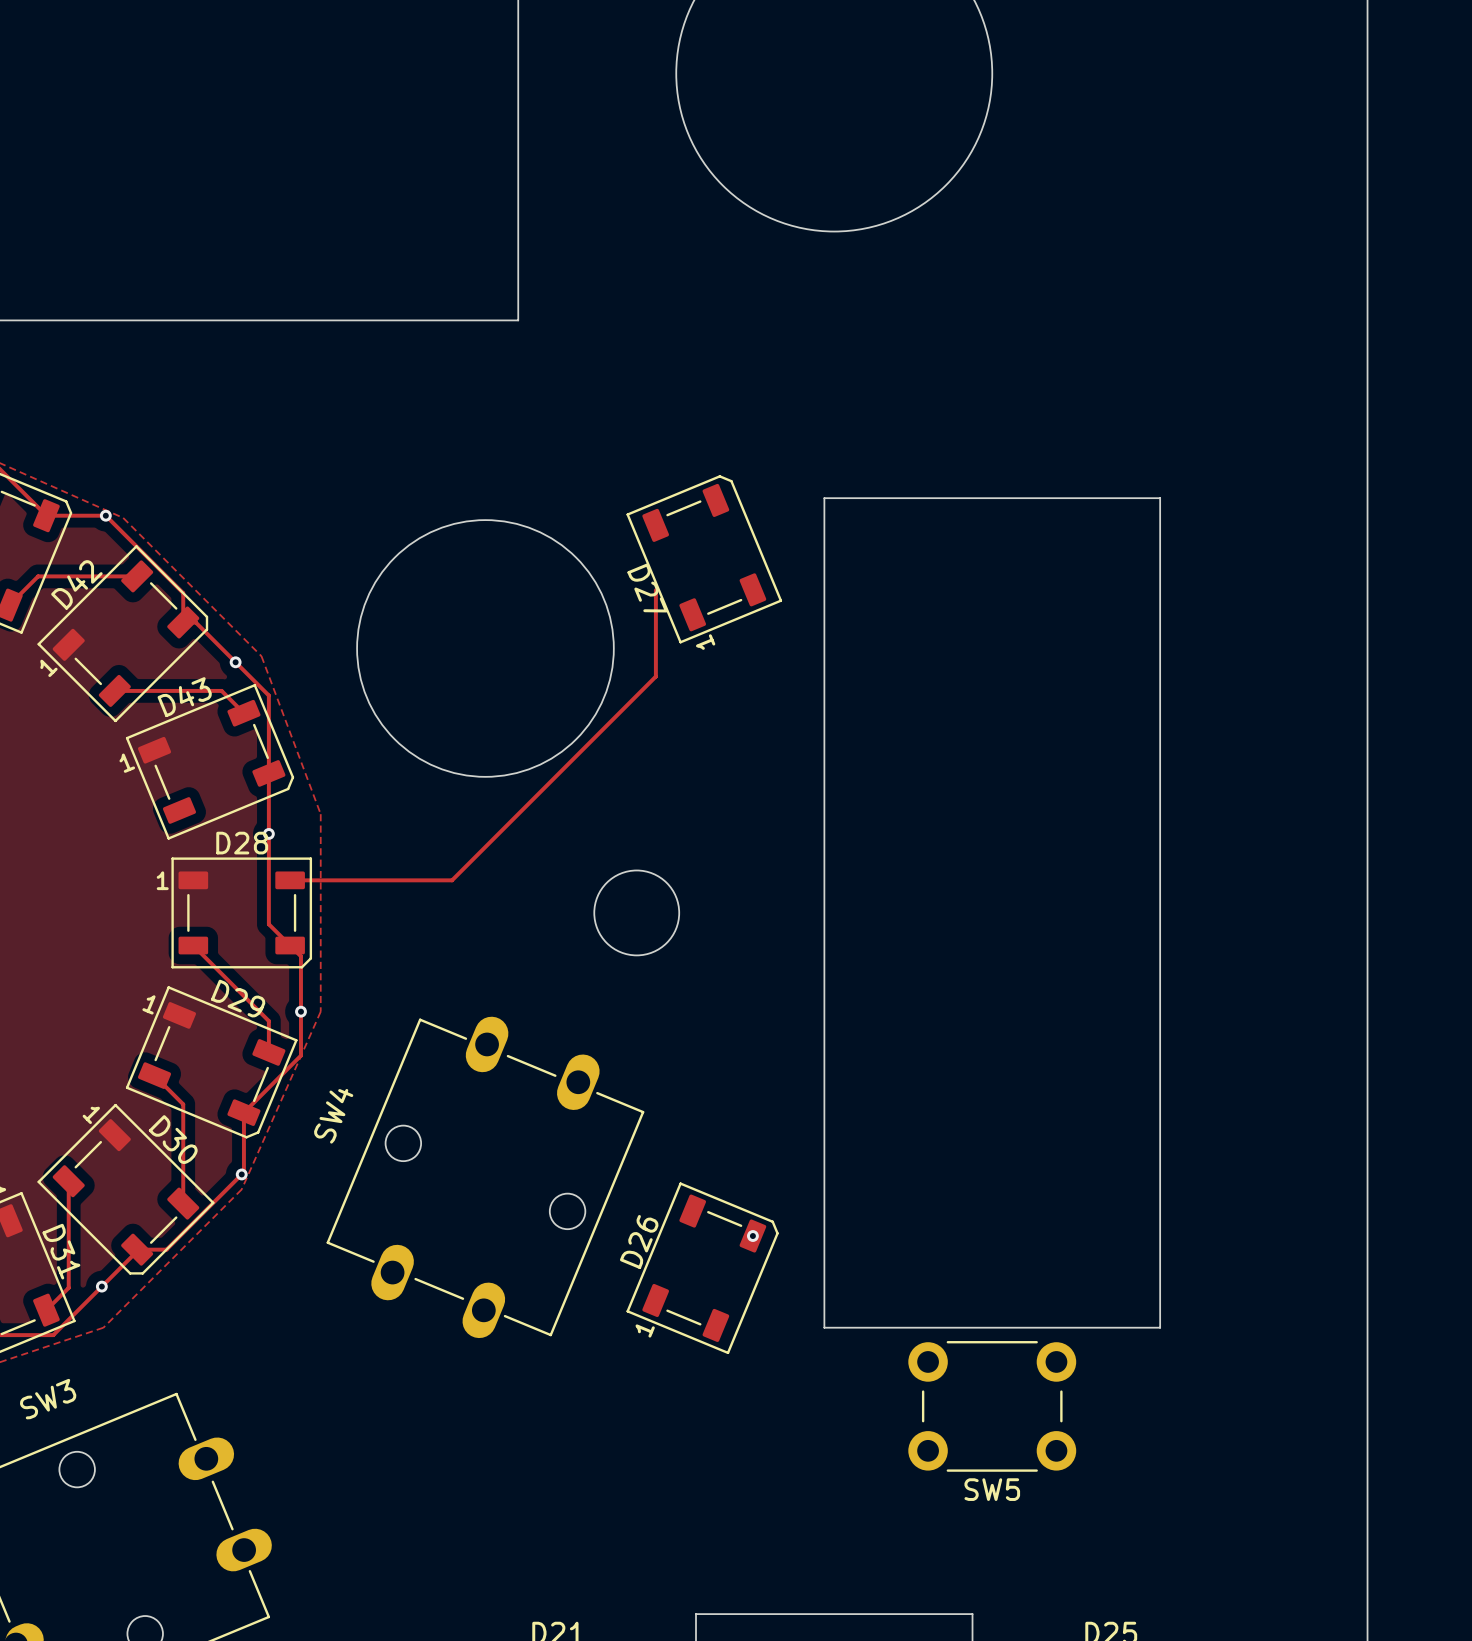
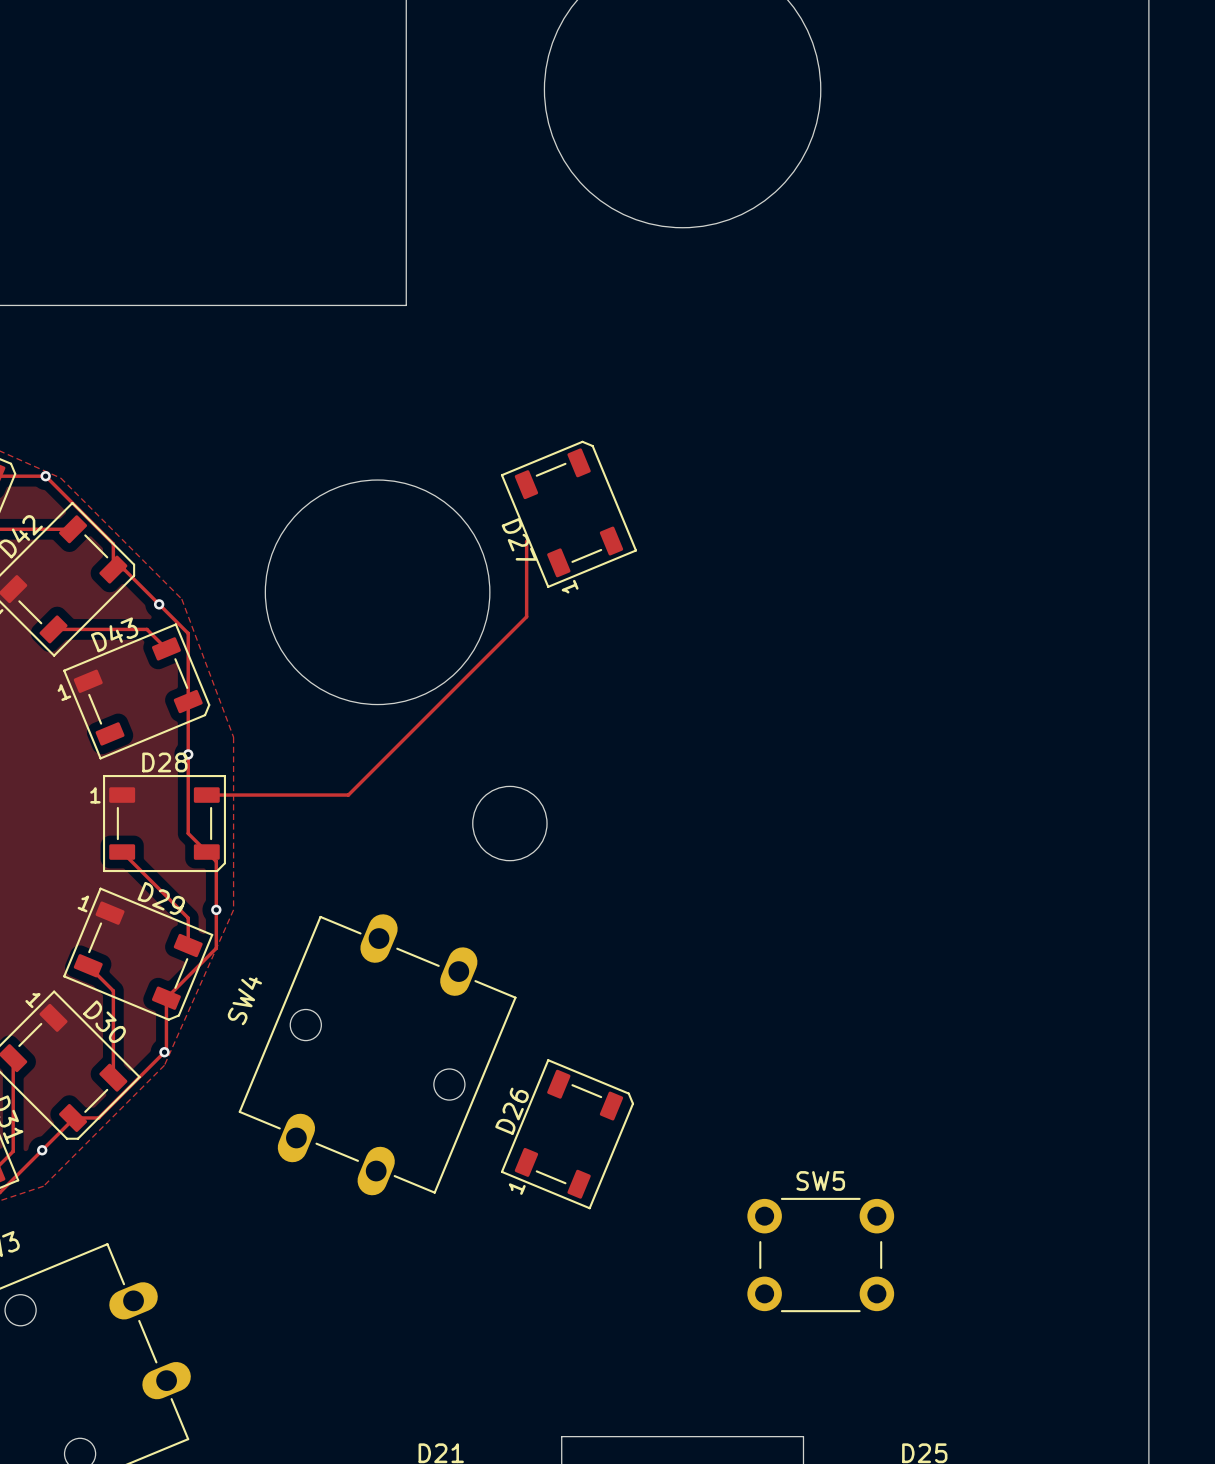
board edge: (824, 498) (1160, 498) (1160, 1327) (824, 1327) (824, 498) -> none
via: (752, 1236) -> none
SW5 name position: SW5 (992, 1489) -> SW5 (820, 1180)

